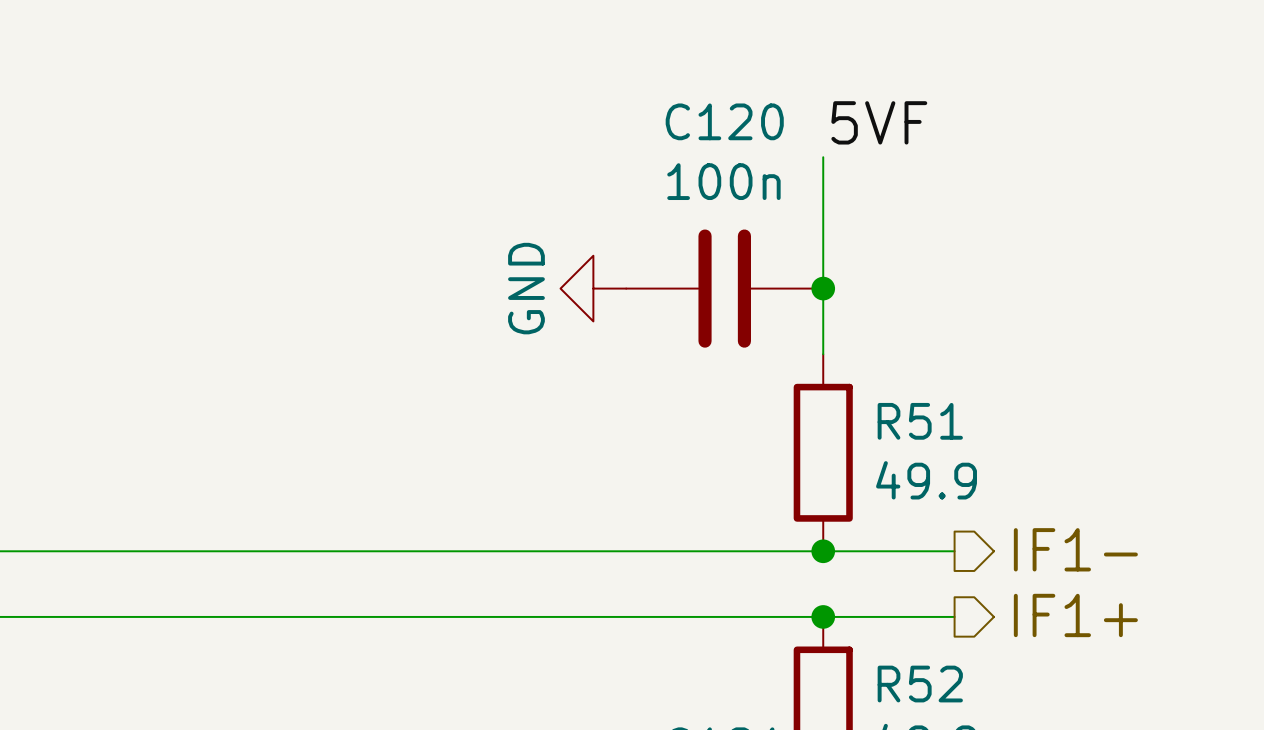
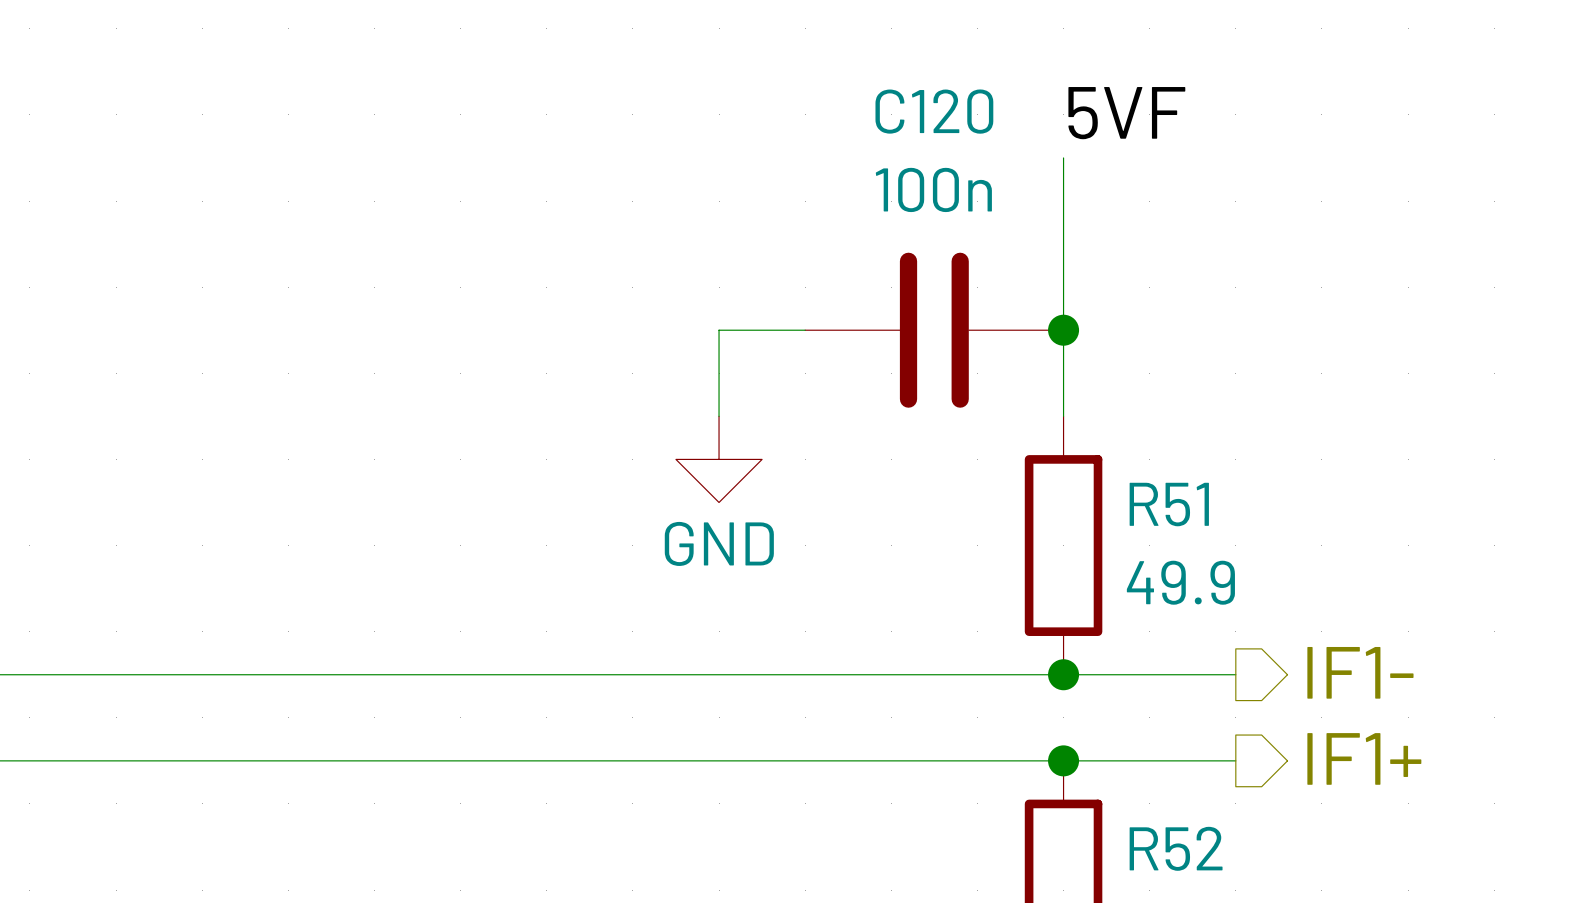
power symbol rotation: 0° (593, 288) -> 90° counterclockwise (719, 459)
power symbol position: GND (593, 288) -> GND (719, 459)
wire: none -> (805, 330) (719, 330) (719, 416)

